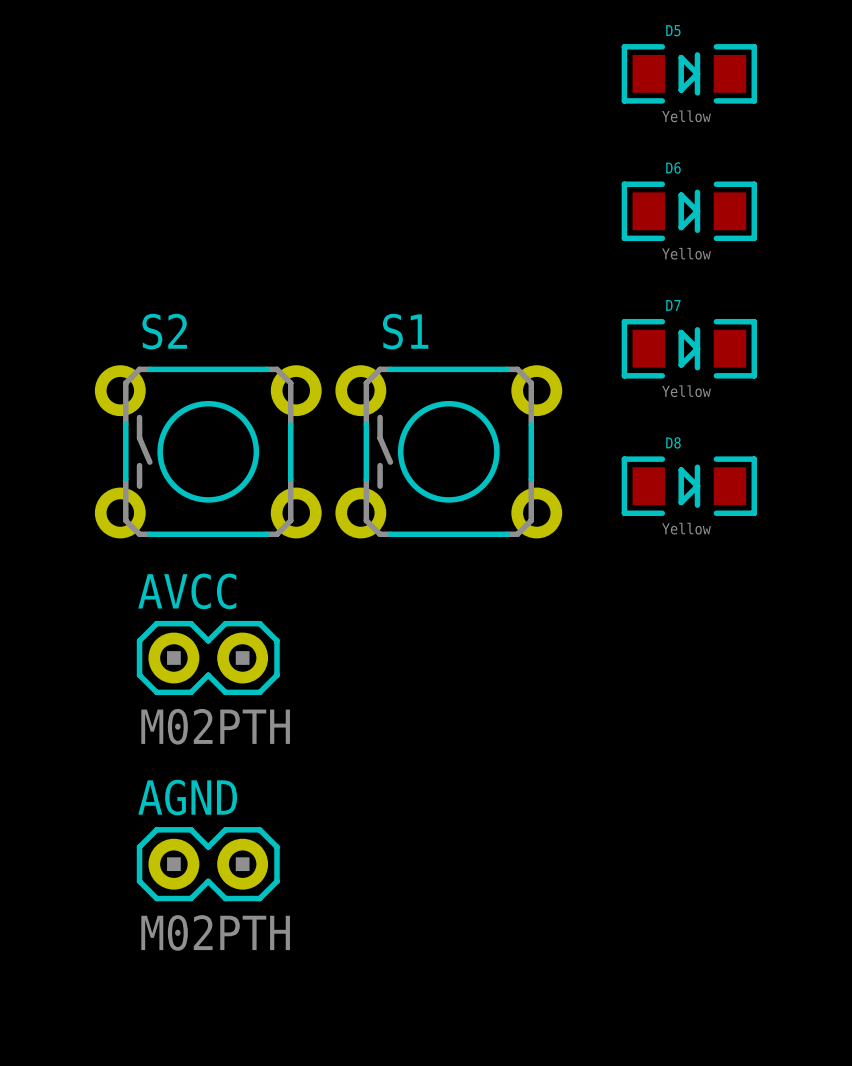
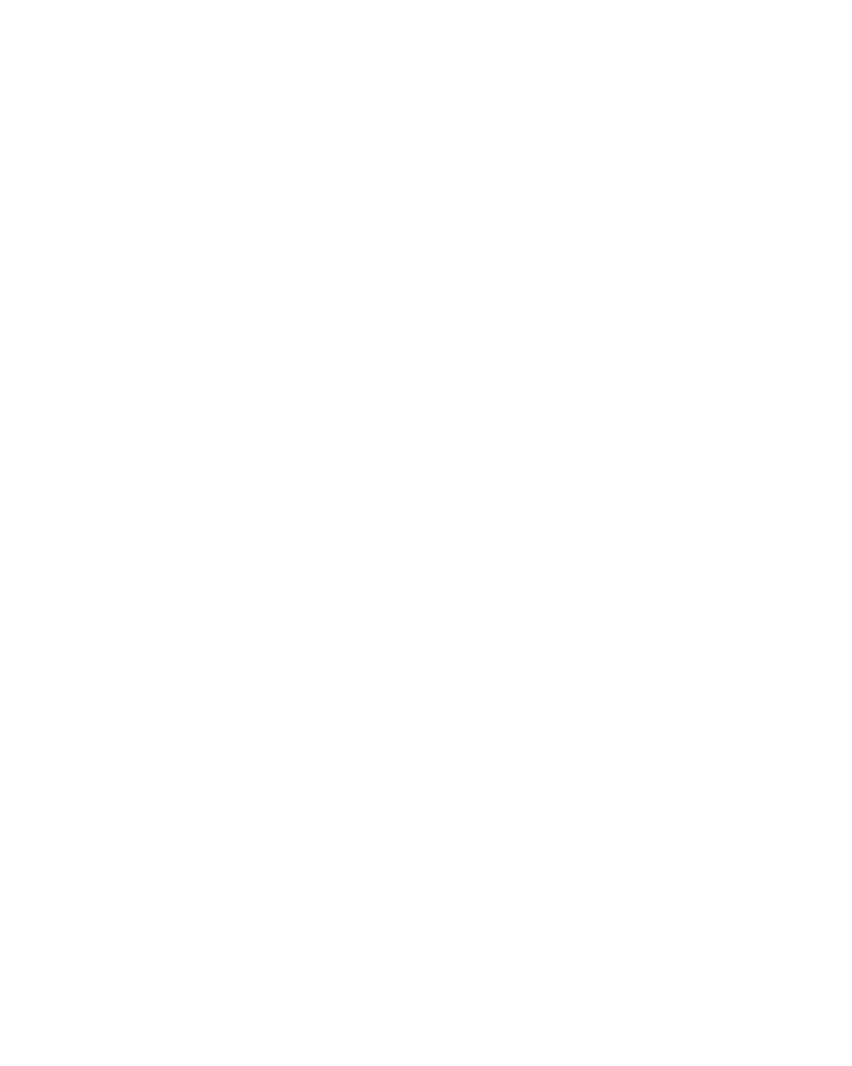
D5: Yellow (689, 73) -> none
D6: Yellow (689, 211) -> none
D7: Yellow (689, 348) -> none
S2: (208, 451) -> none
S1: (448, 451) -> none
D8: Yellow (689, 486) -> none
AVCC: M02PTH (208, 658) -> none
AGND: M02PTH (208, 864) -> none

